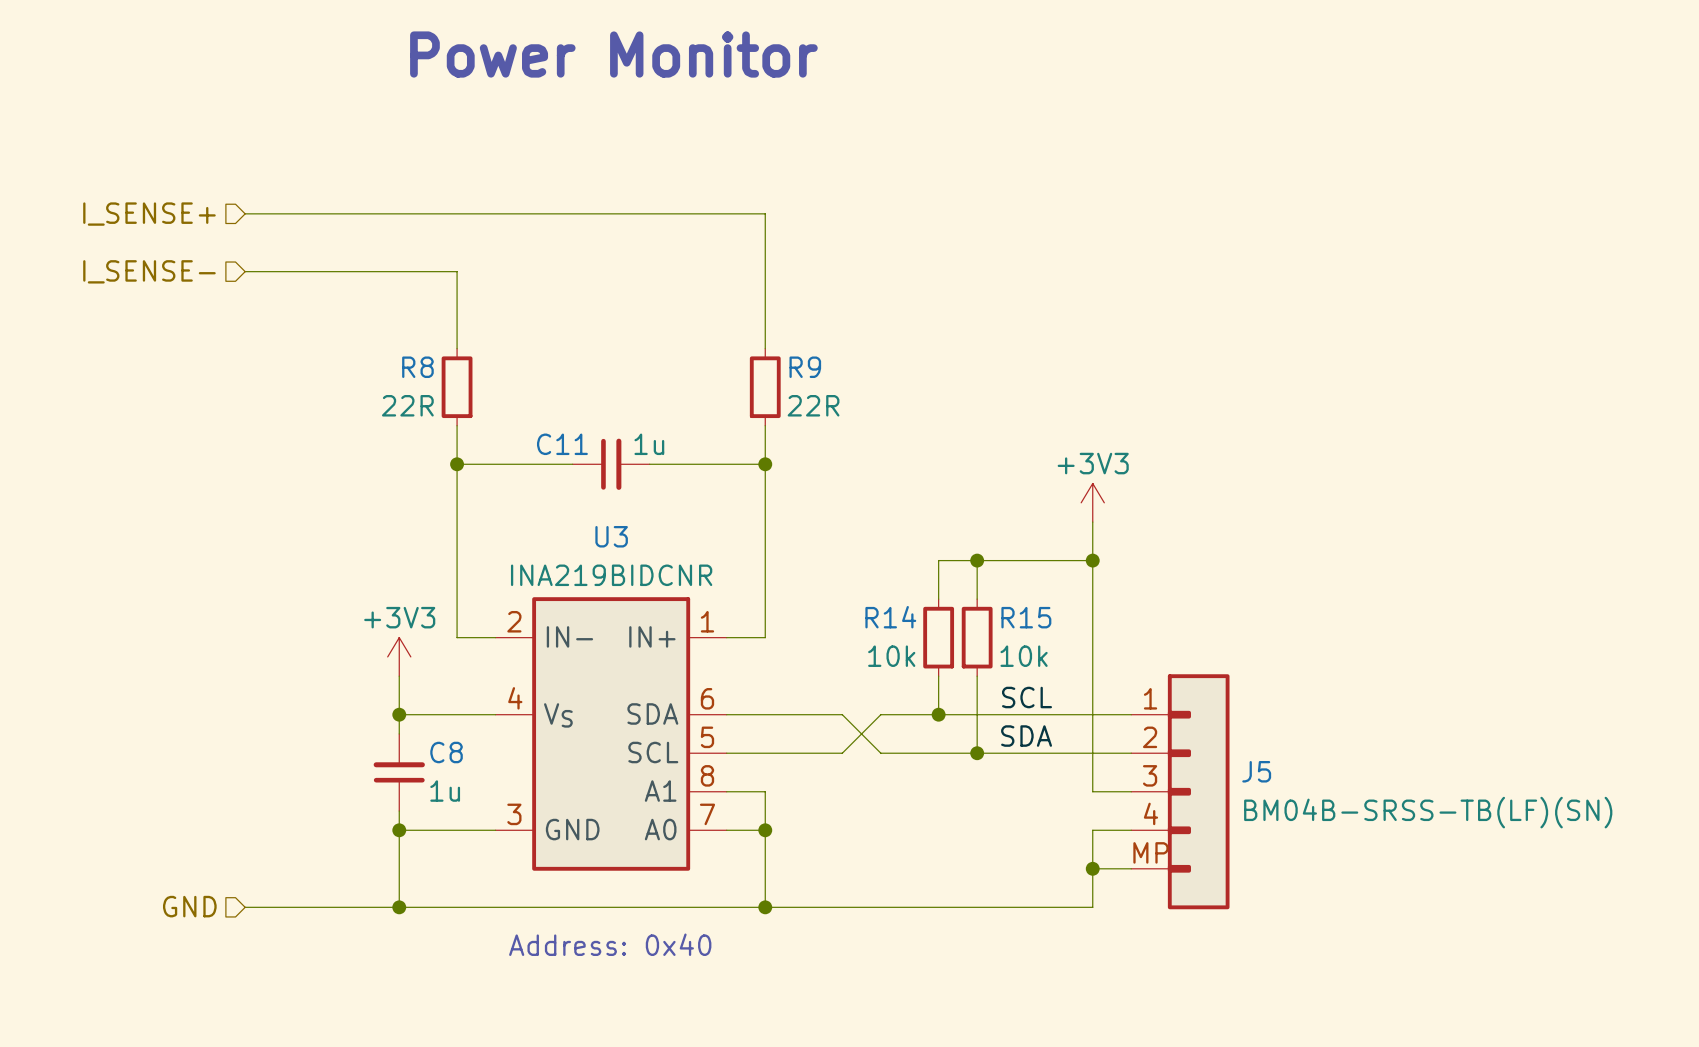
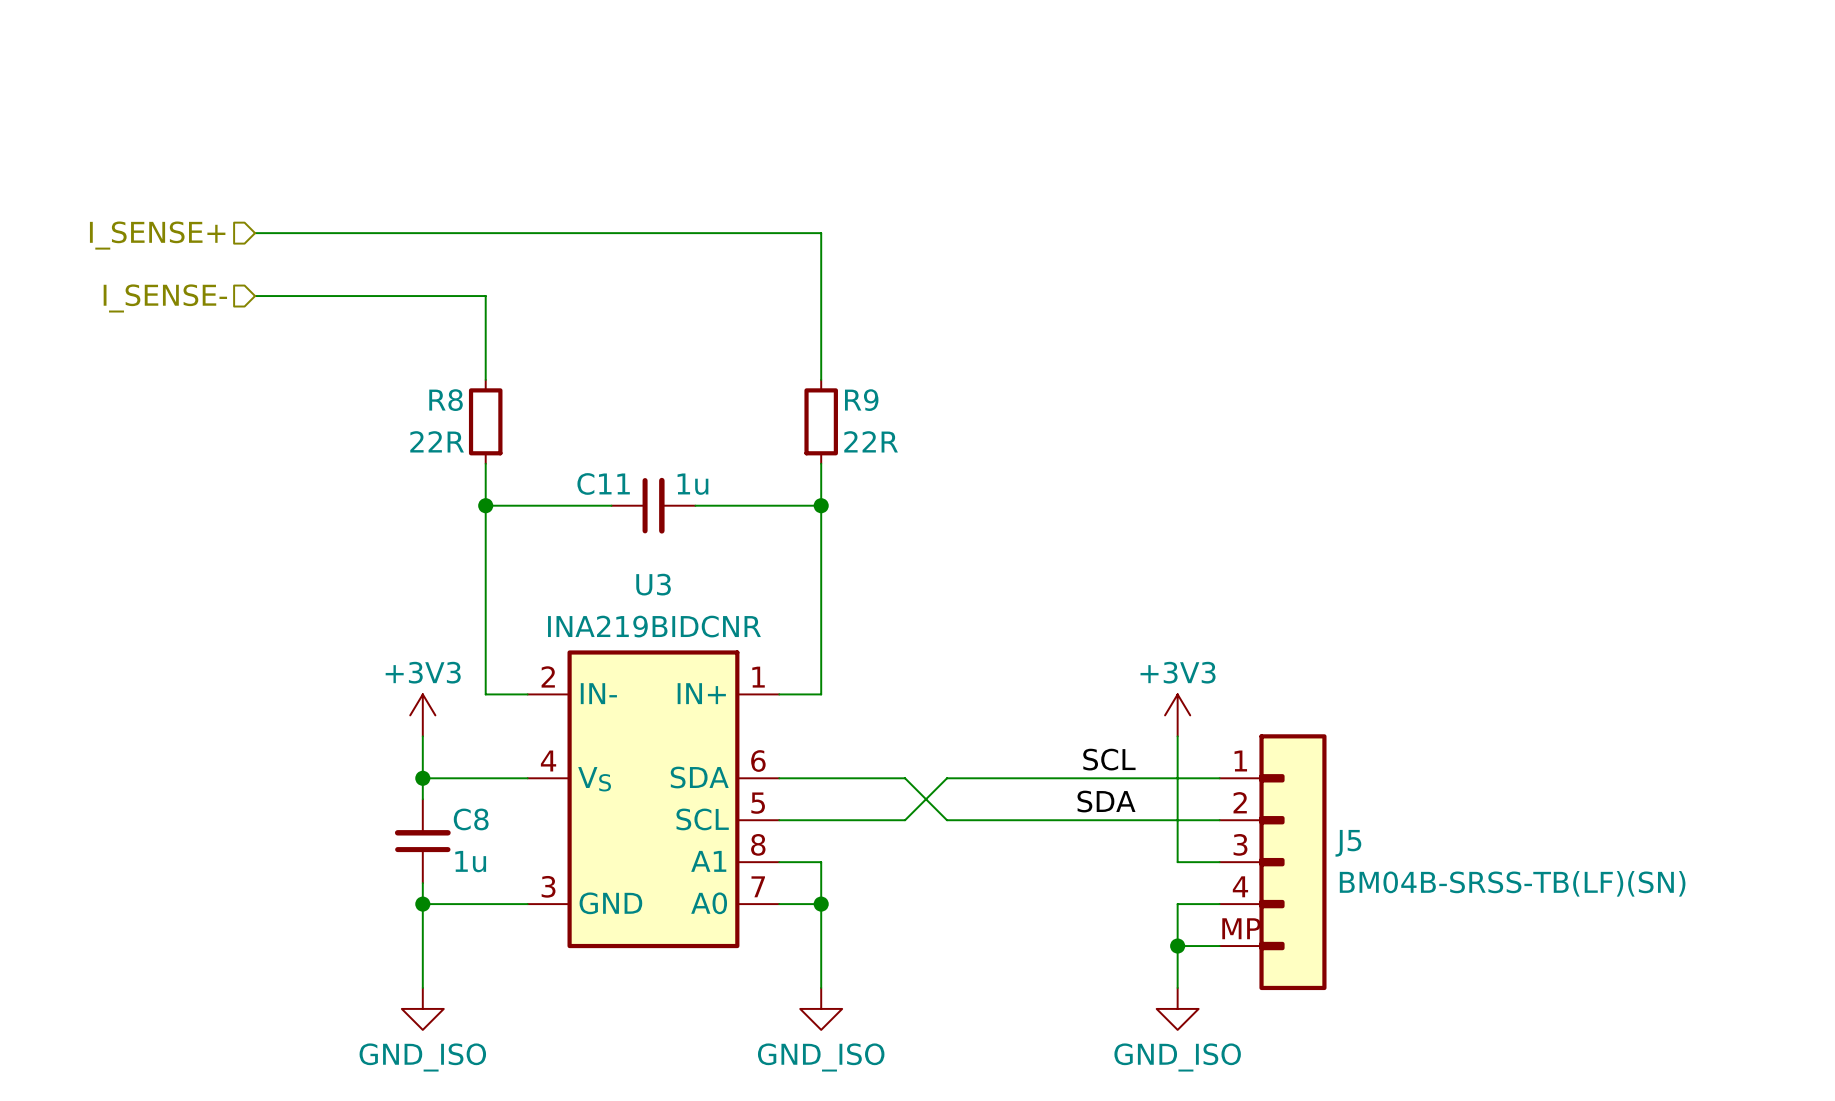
text: Power Monitor (613, 54) -> none
power symbol position: +3V3 (1092, 502) -> +3V3 (1177, 715)
wire: (1092, 522) (1092, 676) -> none
wire: (977, 560) (977, 599) -> none
junction: (977, 560) -> none
wire: (1092, 560) (938, 560) (938, 599) -> none
junction: (1092, 560) -> none
R14: (938, 637) -> none
R15: (977, 637) -> none
wire: (938, 676) (938, 714) -> none
wire: (977, 676) (977, 753) -> none
junction: (938, 714) -> none
junction: (977, 753) -> none
hierarchical label: GND (189, 906) -> none
wire: (245, 907) (1092, 907) -> none
junction: (399, 907) -> none
junction: (765, 907) -> none
power symbol: none -> GND_ISO (422, 1008)
power symbol: none -> GND_ISO (821, 1008)
power symbol: none -> GND_ISO (1177, 1008)
text: Address: 0x40 (610, 944) -> none

